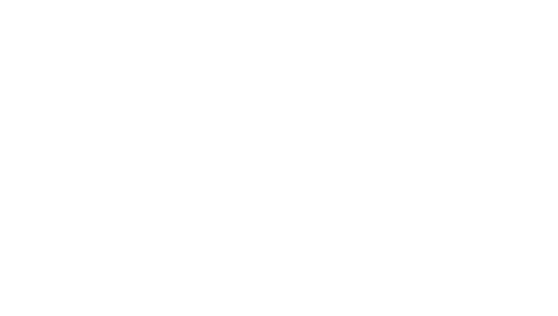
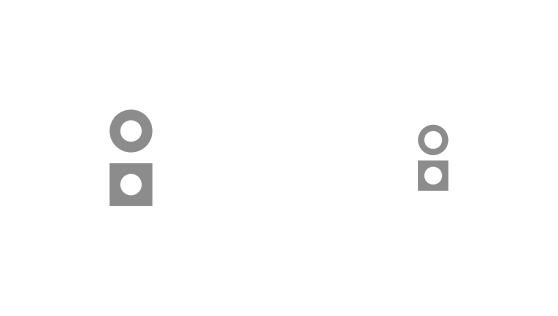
part: none -> (131, 157)
part: none -> (433, 157)

